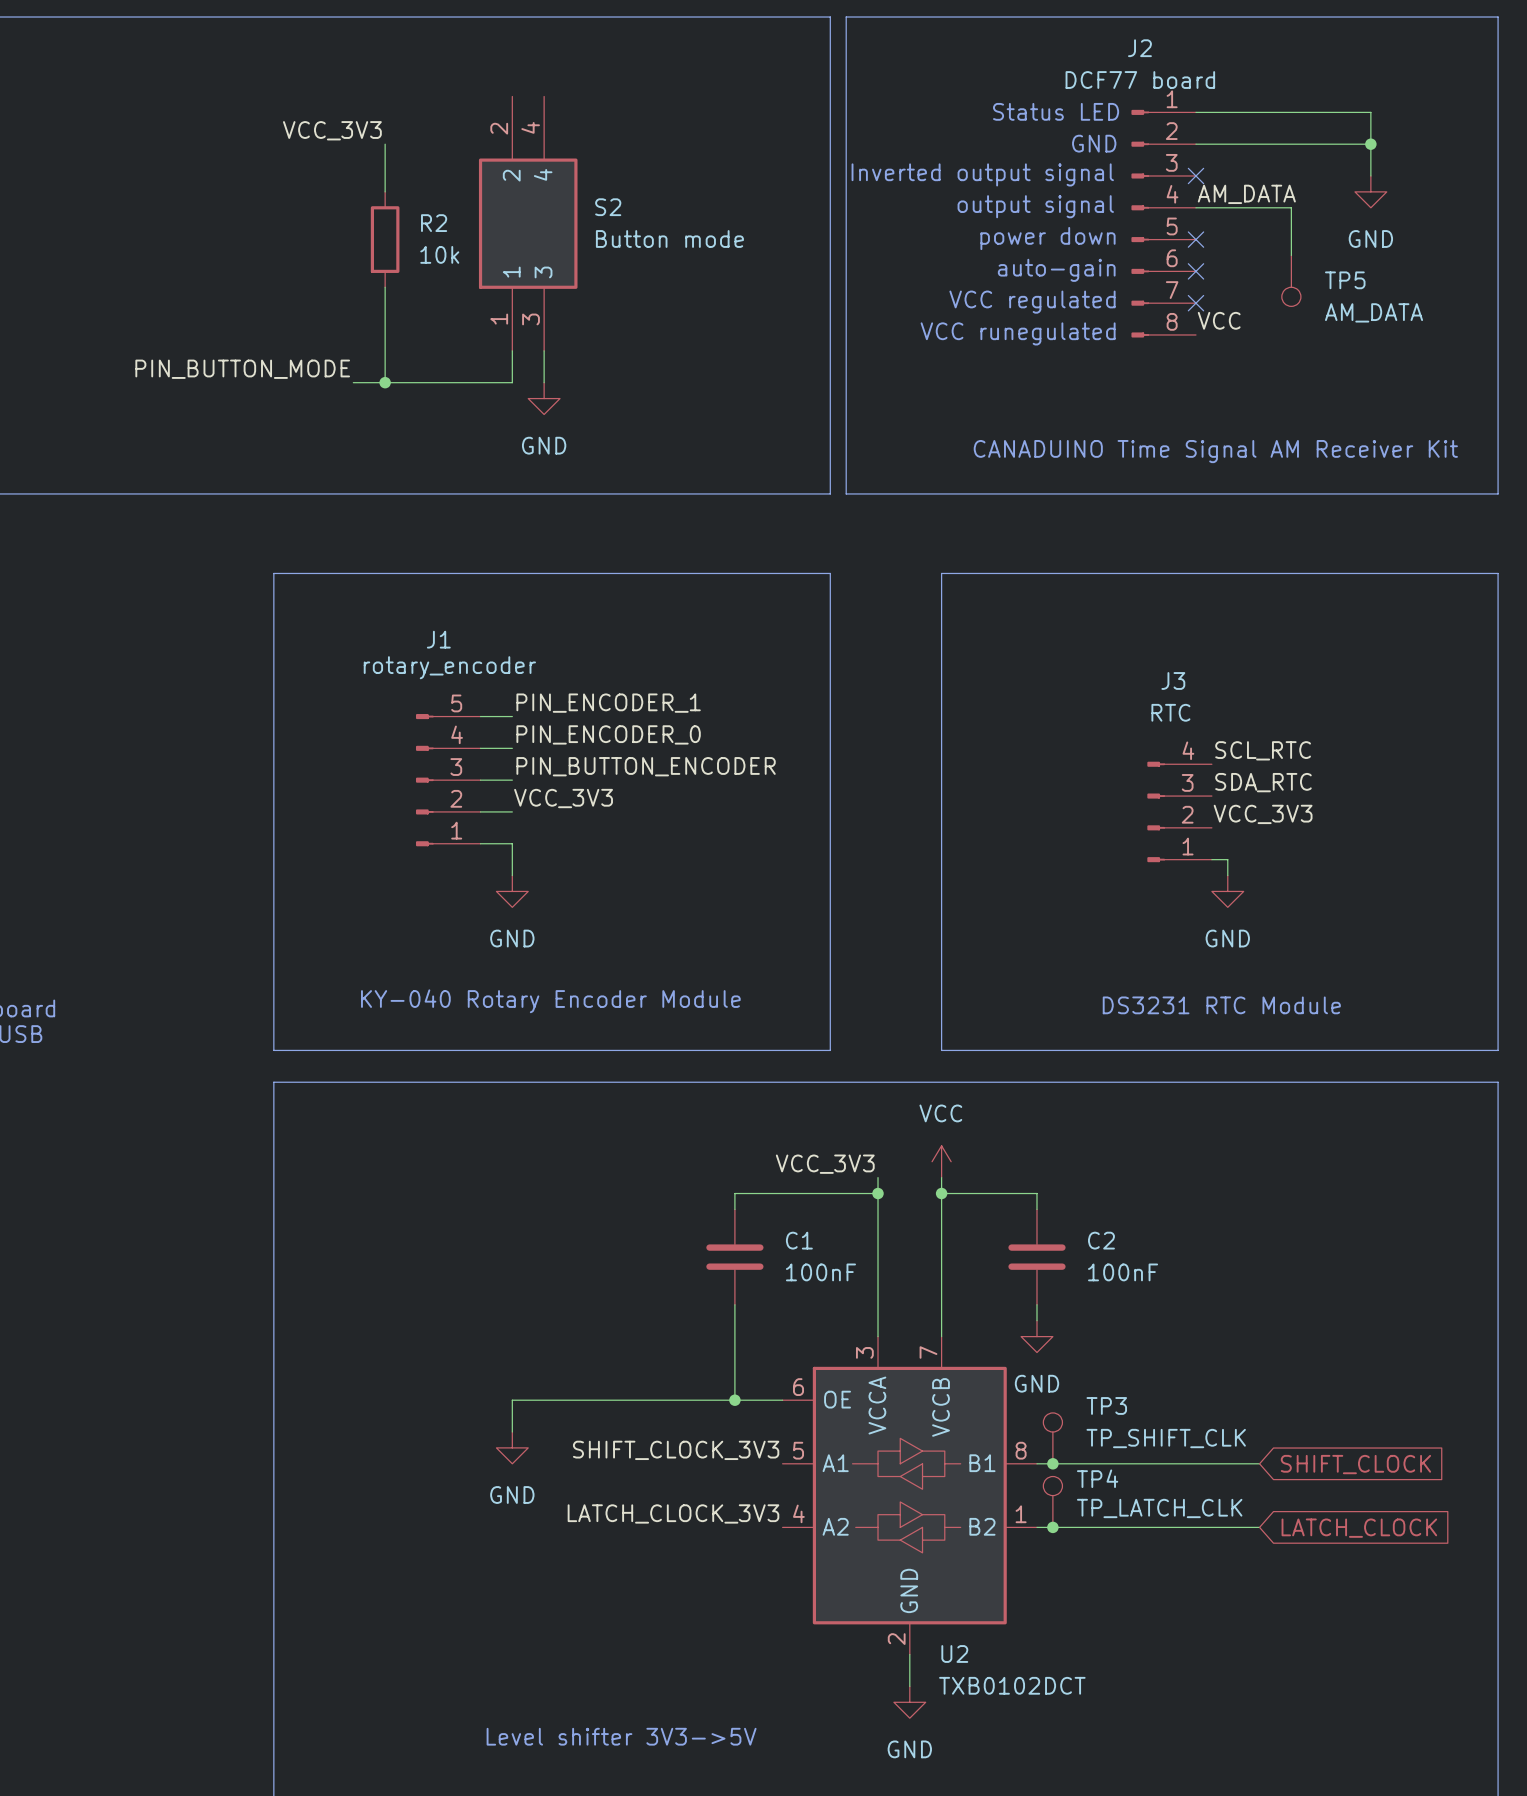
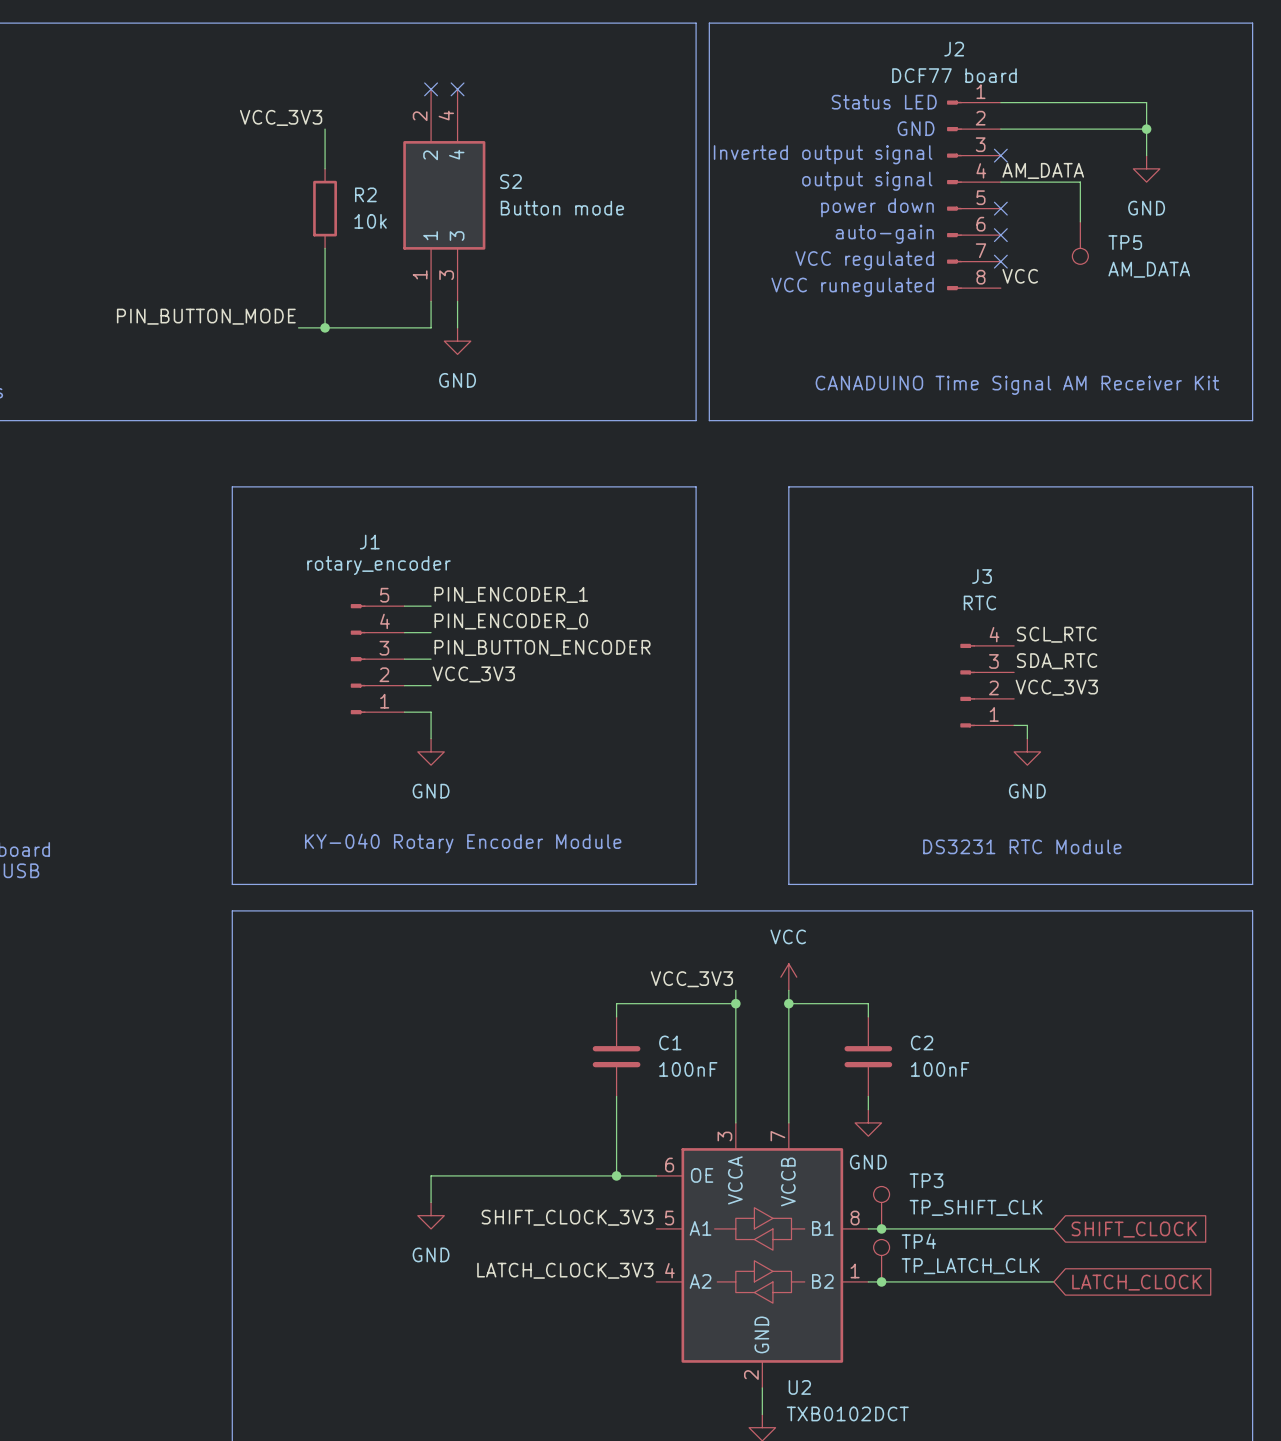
no-connect mark: none -> (431, 89)
no-connect mark: none -> (457, 89)

